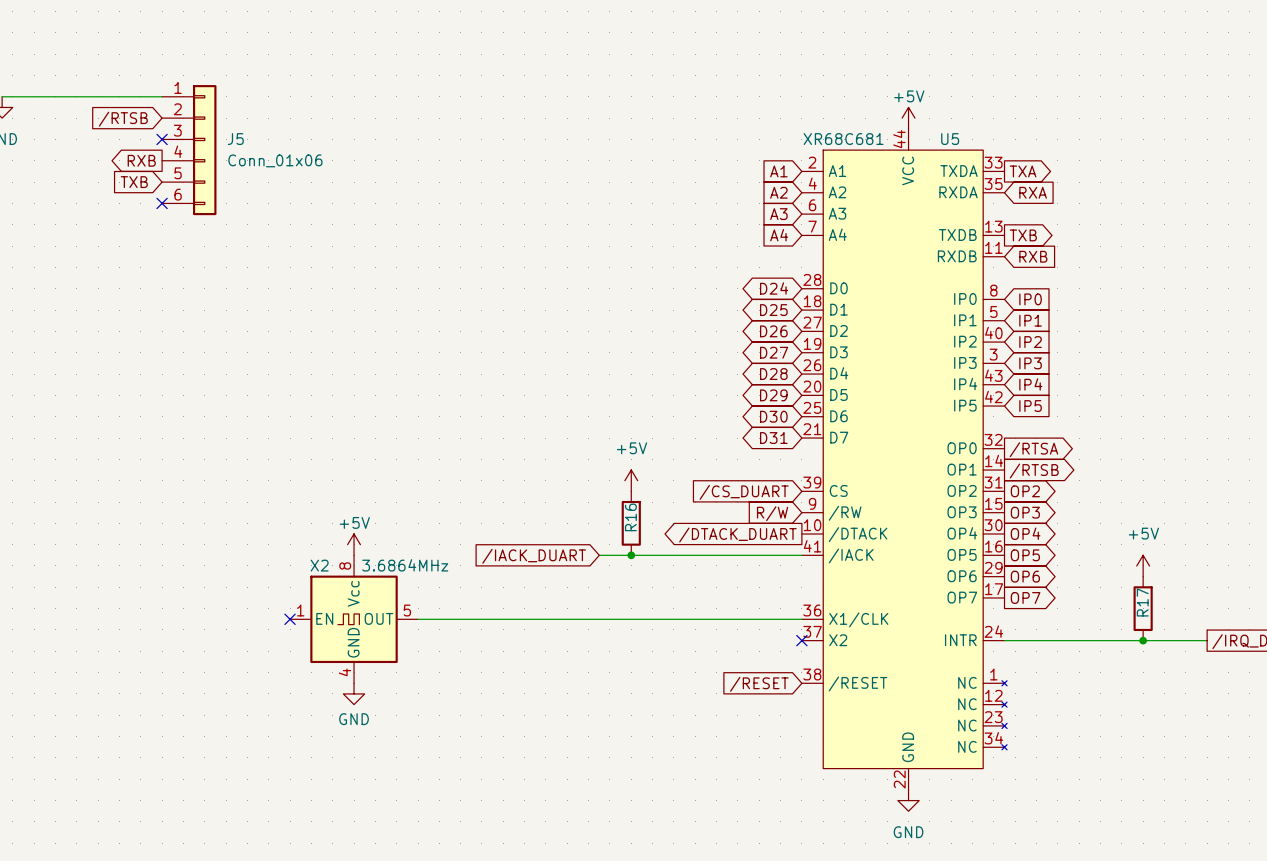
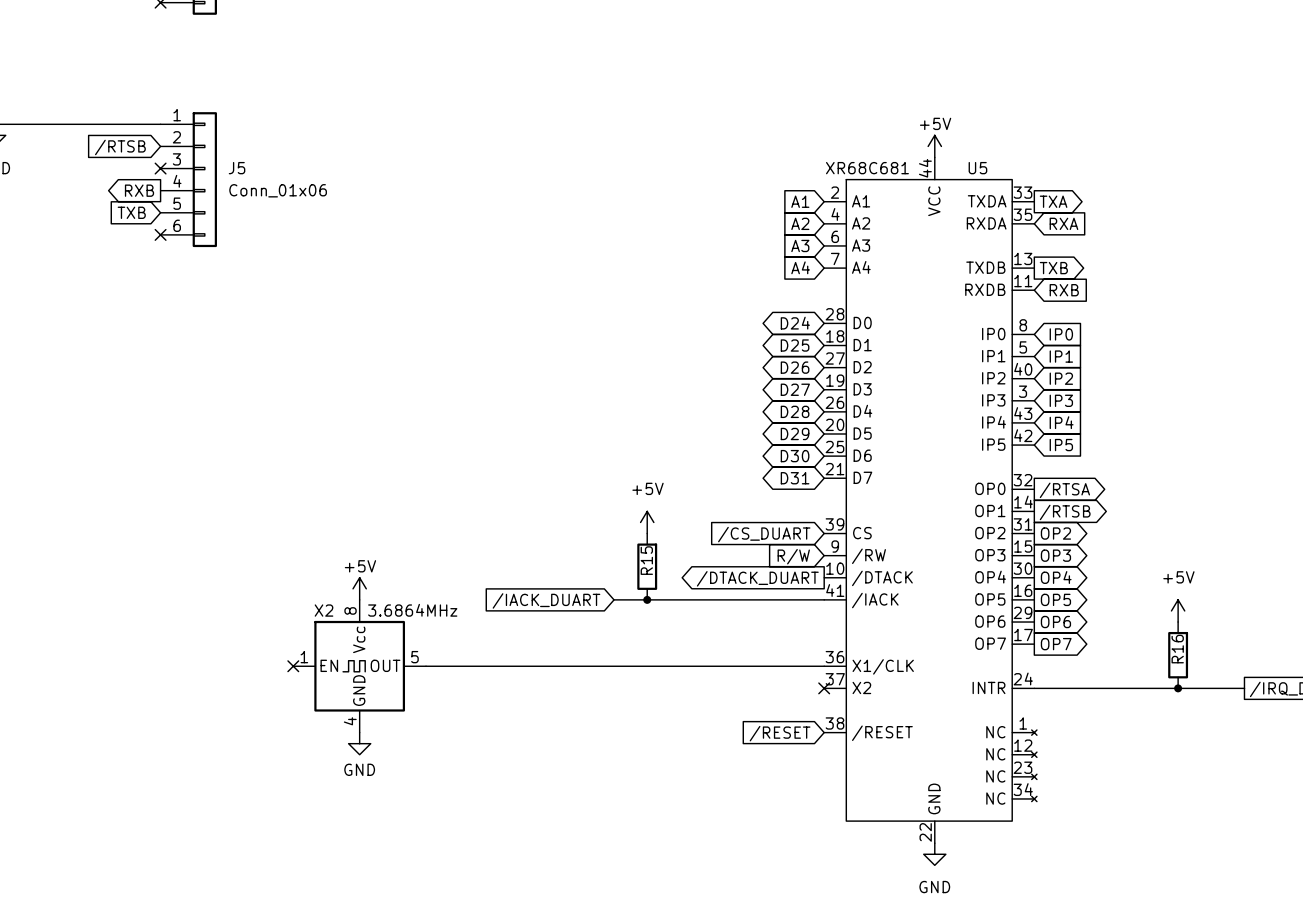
R16 name: R16 (630, 517) -> R15 (646, 560)
R17 name: R17 (1142, 602) -> R16 (1177, 649)

